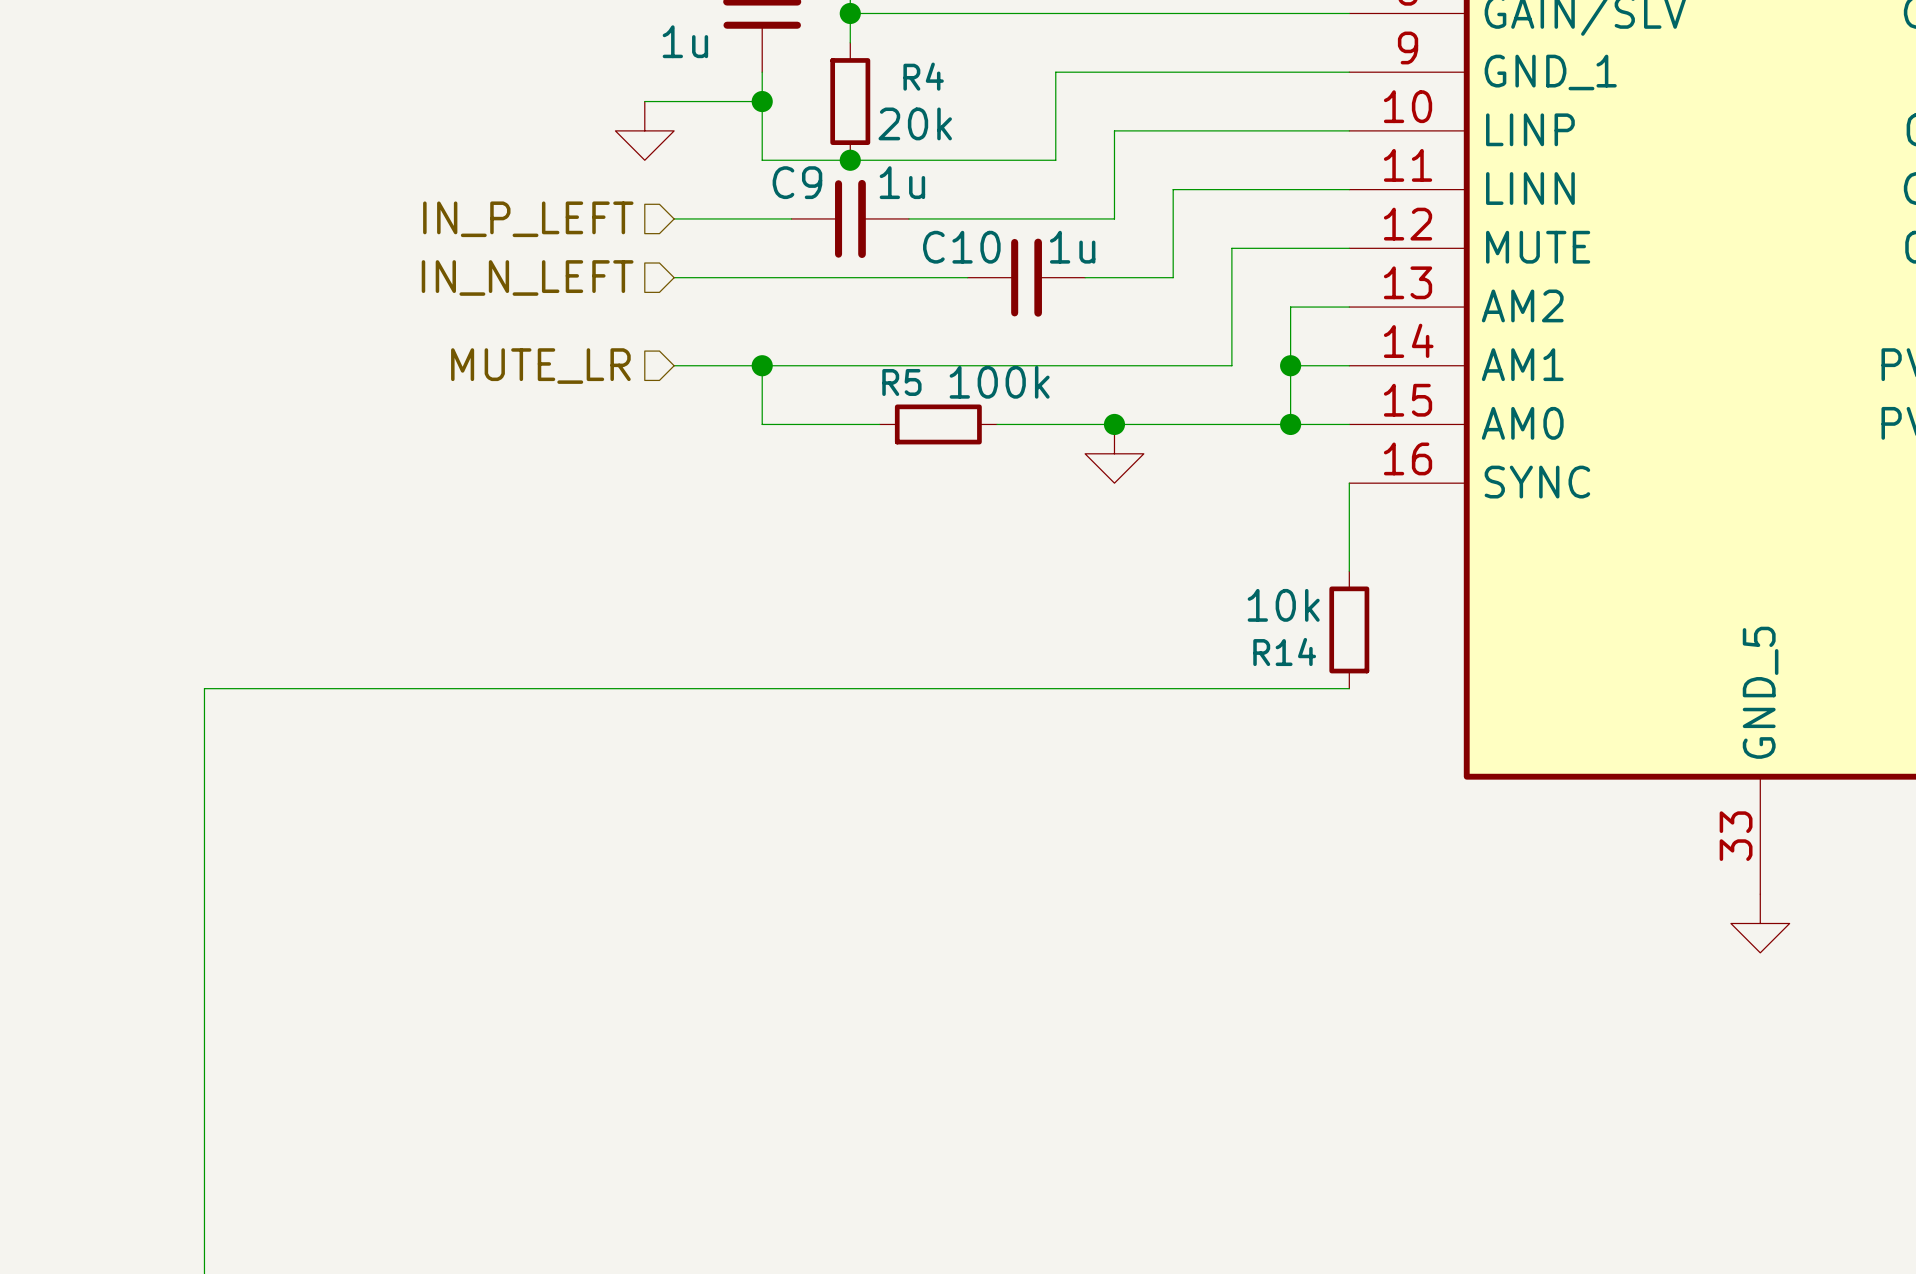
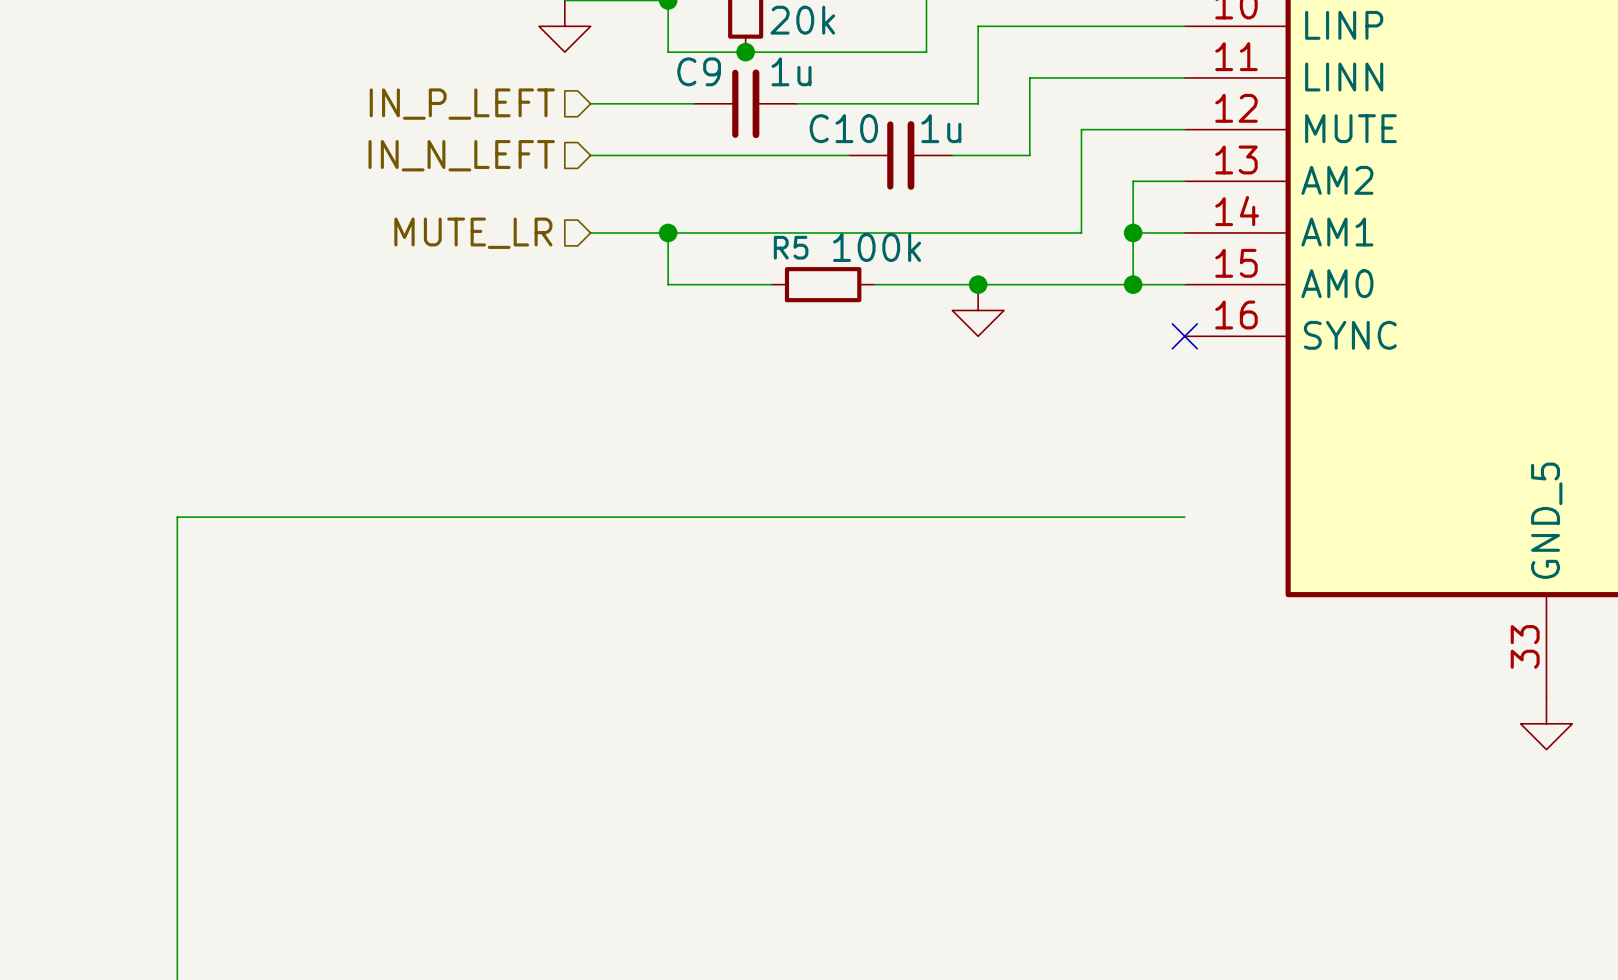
wire: (1349, 483) (1349, 571) -> none
no-connect mark: none -> (1184, 336)
R14: 10k (1349, 629) -> none

